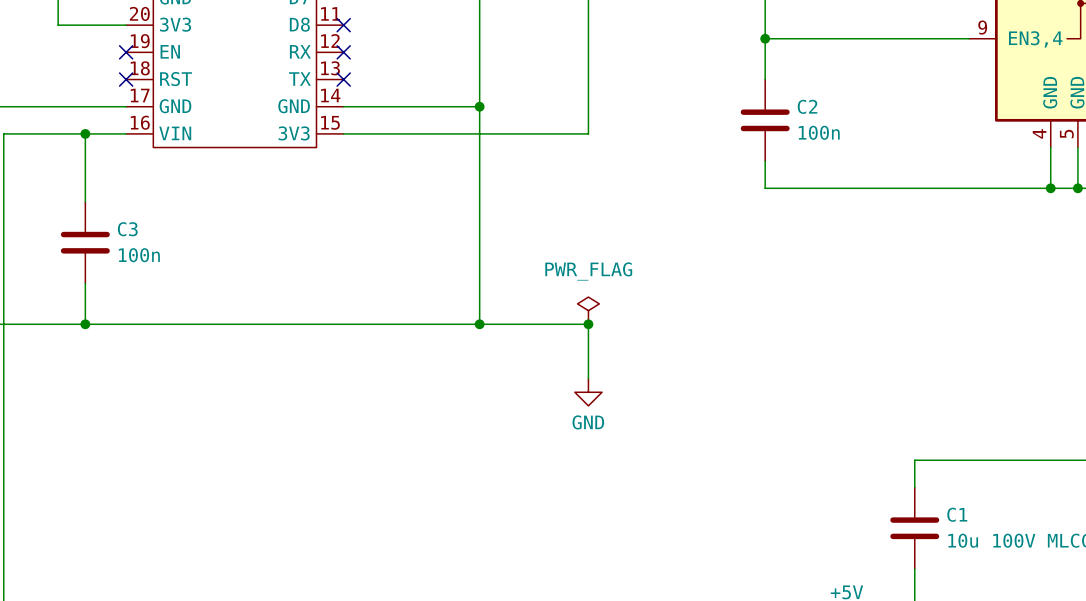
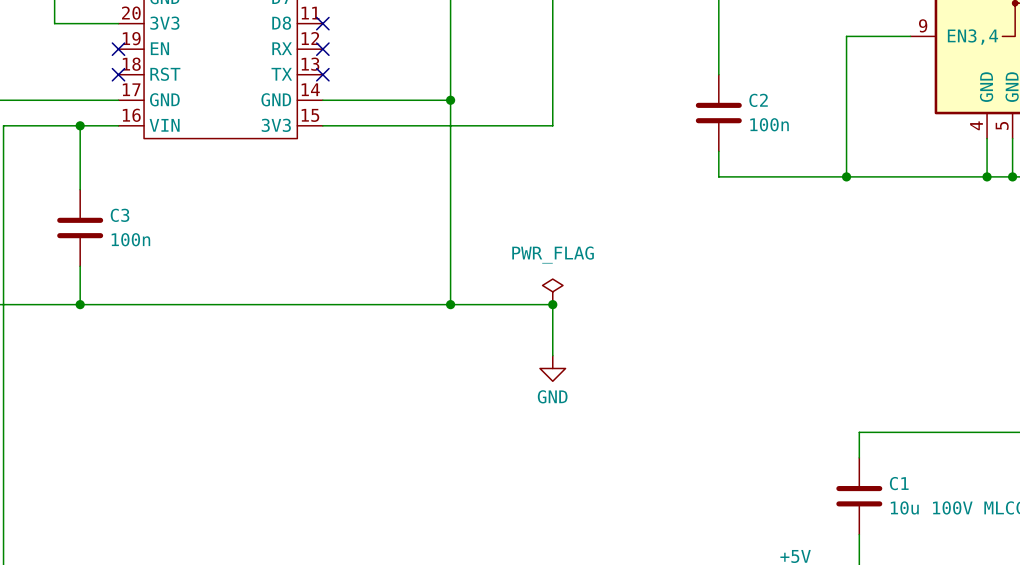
wire: (765, 38) (901, 38) -> (846, 176) (846, 36)
junction: (765, 38) -> none
junction: none -> (846, 176)

